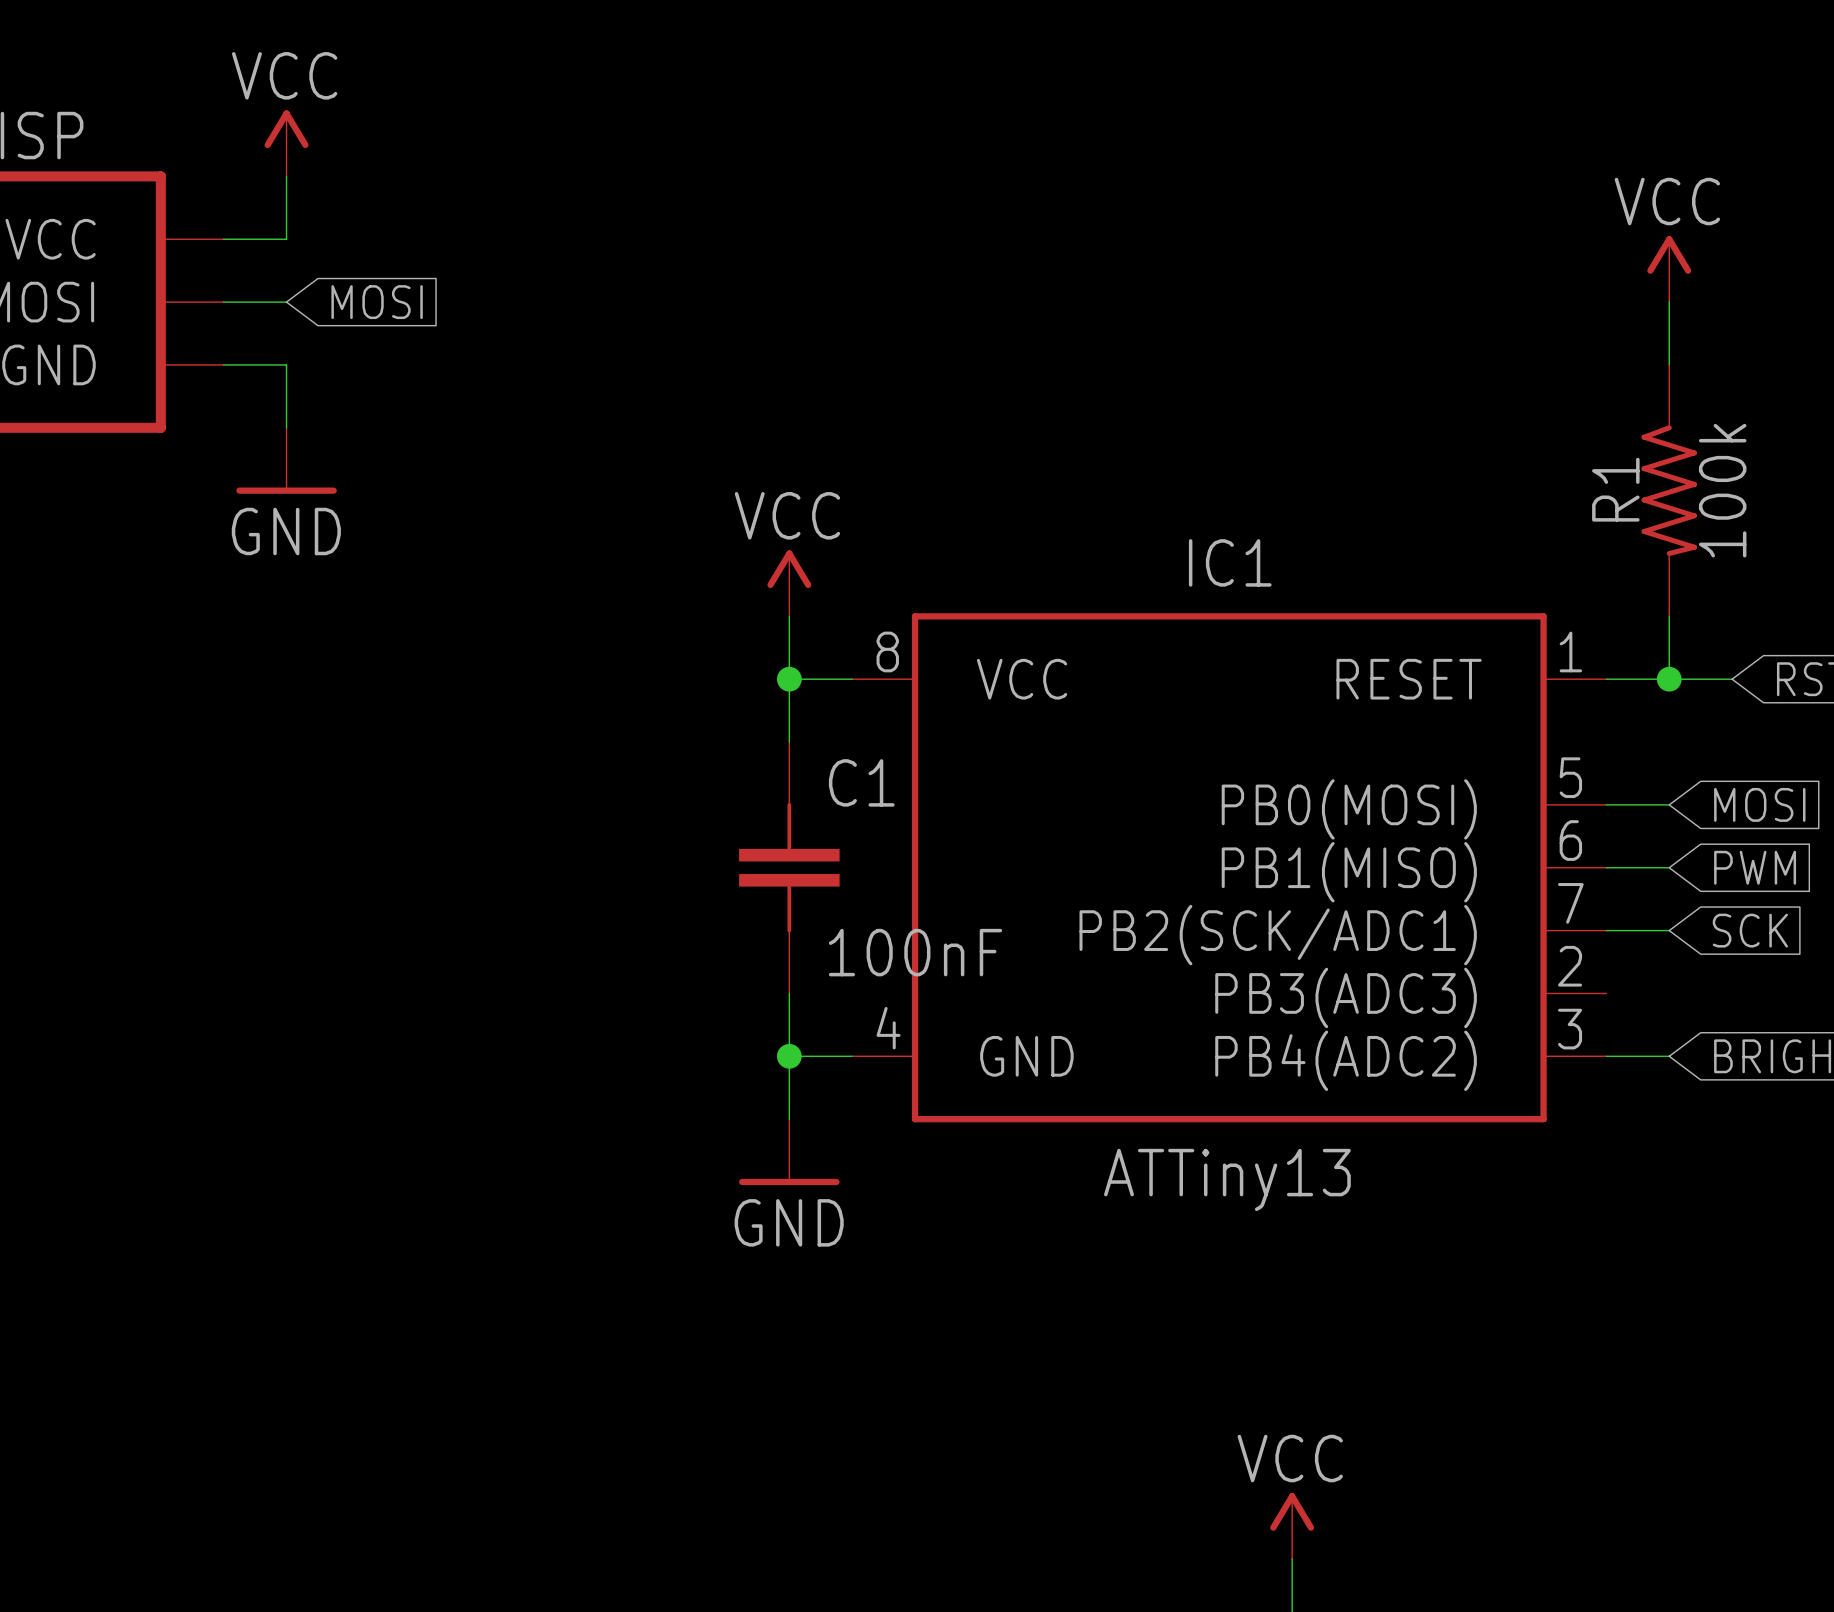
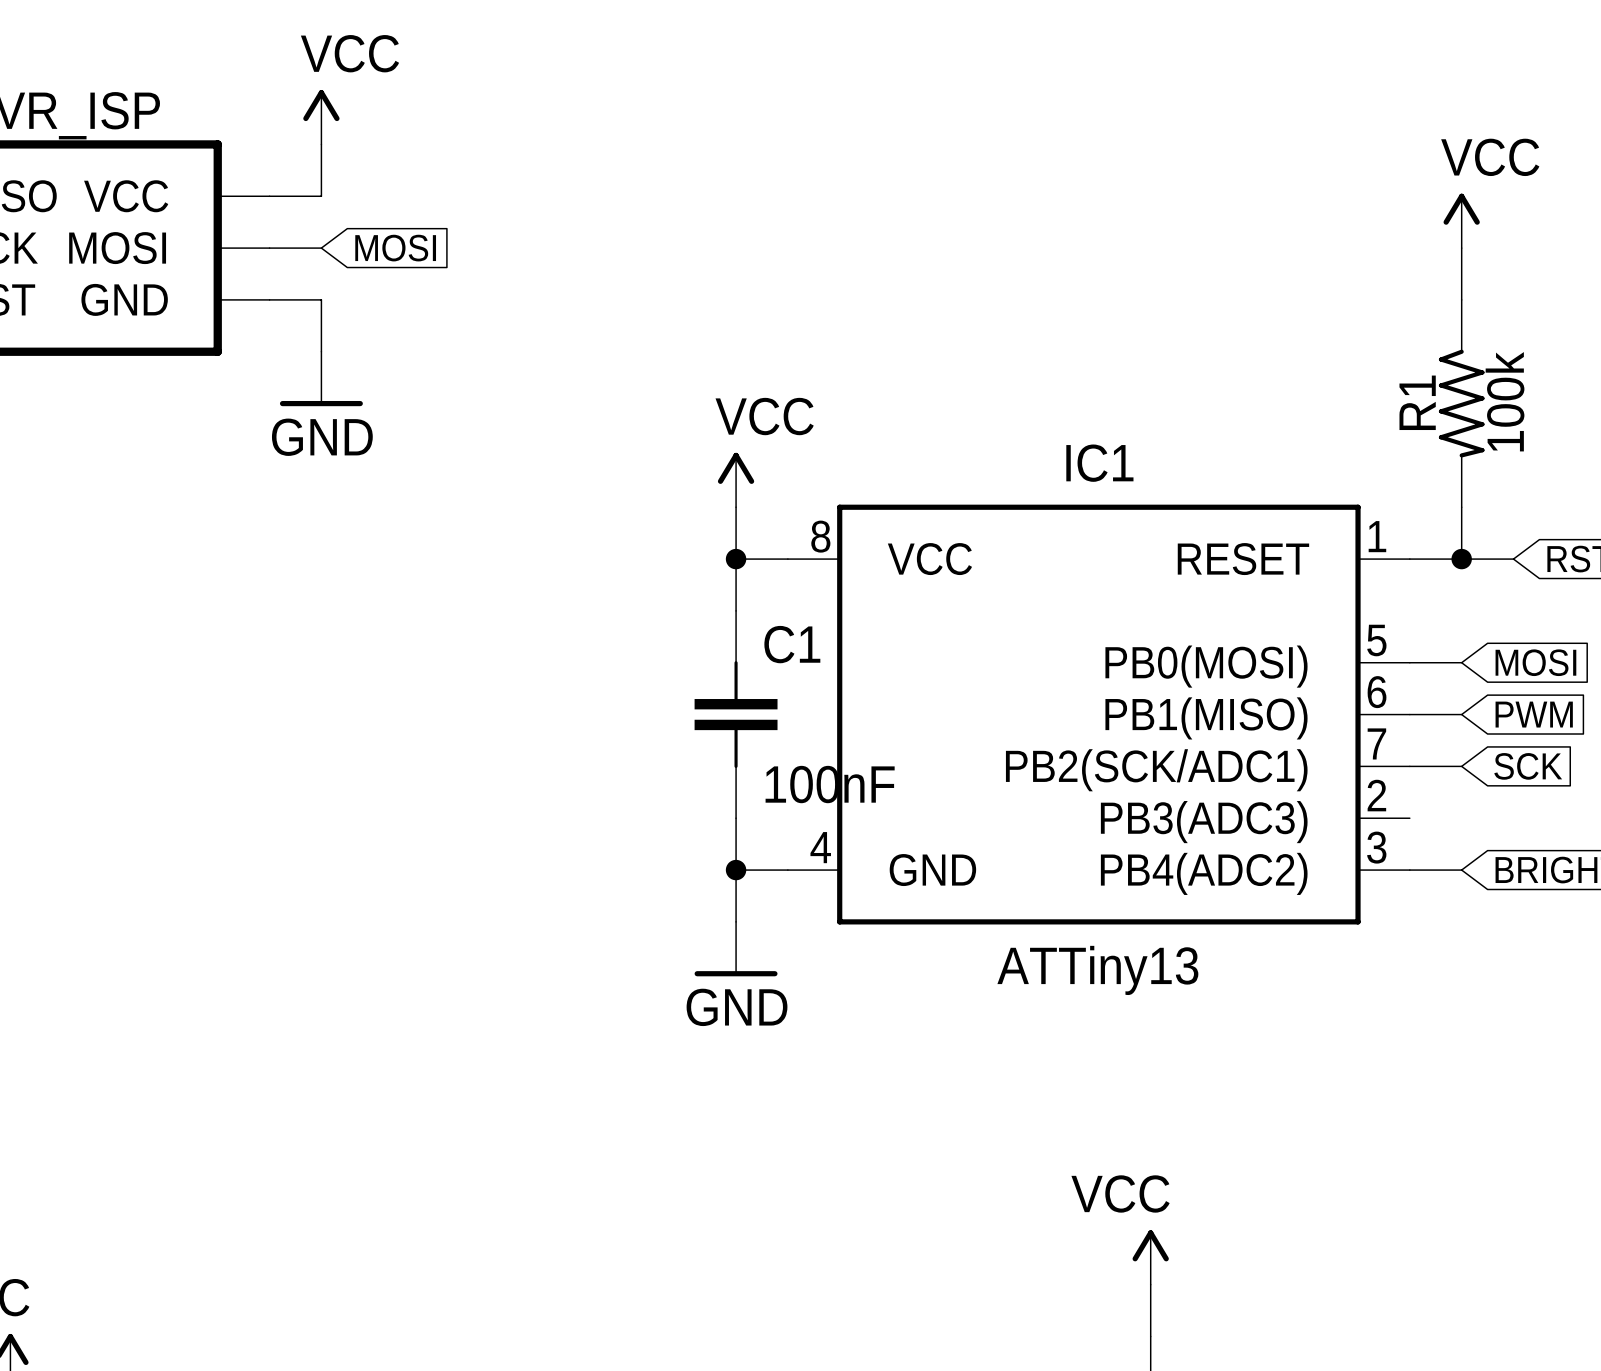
power symbol text position: VCC (284, 75) -> VCC (349, 53)
power symbol text position: VCC (1667, 201) -> VCC (1490, 157)
power symbol text position: VCC (787, 515) -> VCC (764, 416)
power symbol text position: VCC (1290, 1458) -> VCC (1120, 1193)

